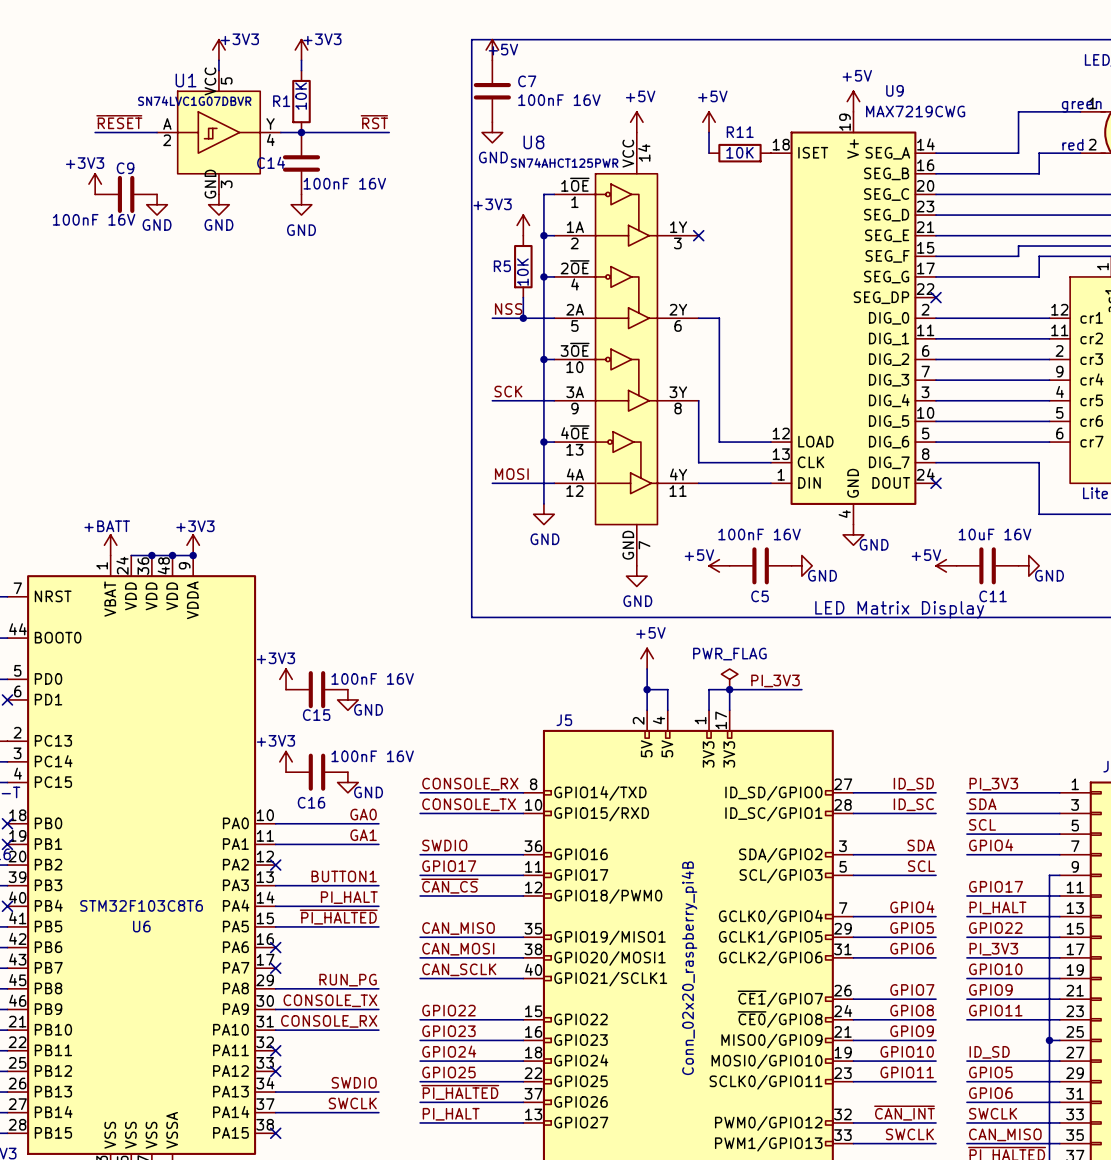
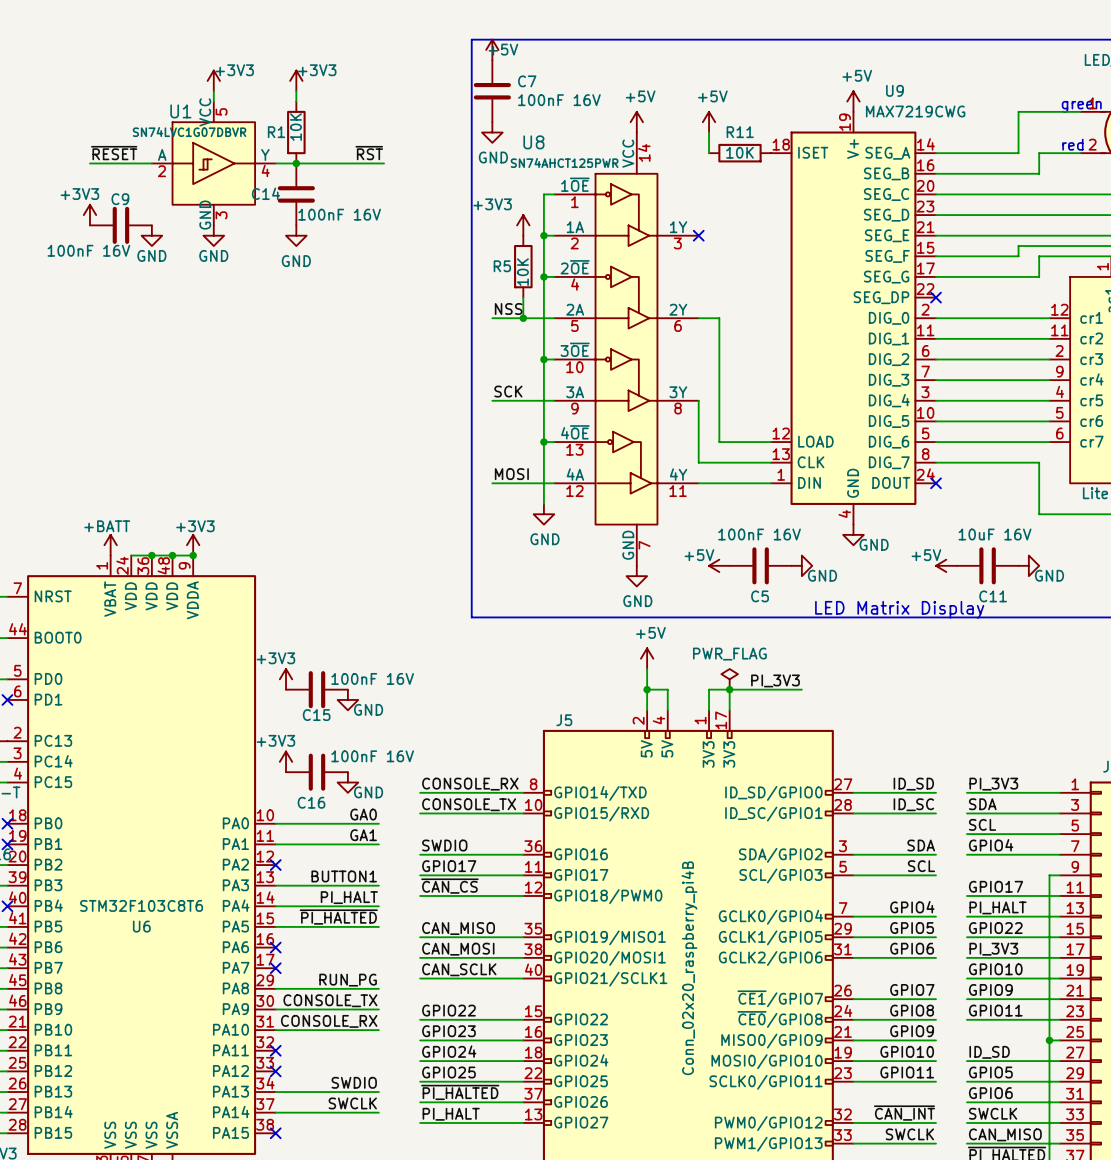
power symbol position: +3V3 (218, 49) -> +3V3 (213, 80)
power symbol position: +3V3 (301, 49) -> +3V3 (296, 80)
wire: (301, 60) (301, 70) -> (296, 91) (296, 101)
R1 position: (301, 101) -> (296, 132)
label position: ~{RESET} (119, 122) -> ~{RESET} (114, 153)
label position: ~{RST} (374, 122) -> ~{RST} (369, 153)
wire: (95, 132) (157, 132) -> (89, 163) (151, 163)
U1 position: (218, 132) -> (213, 163)
wire: (280, 132) (389, 132) -> (275, 163) (384, 163)
junction position: (301, 132) -> (296, 163)
C14 position: (301, 163) -> (296, 194)
power symbol position: +3V3 (95, 184) -> +3V3 (89, 215)
C9 position: (126, 194) -> (120, 225)
power symbol position: GND (157, 204) -> GND (151, 235)
power symbol position: GND (218, 204) -> GND (213, 235)
power symbol position: GND (301, 204) -> GND (296, 235)

